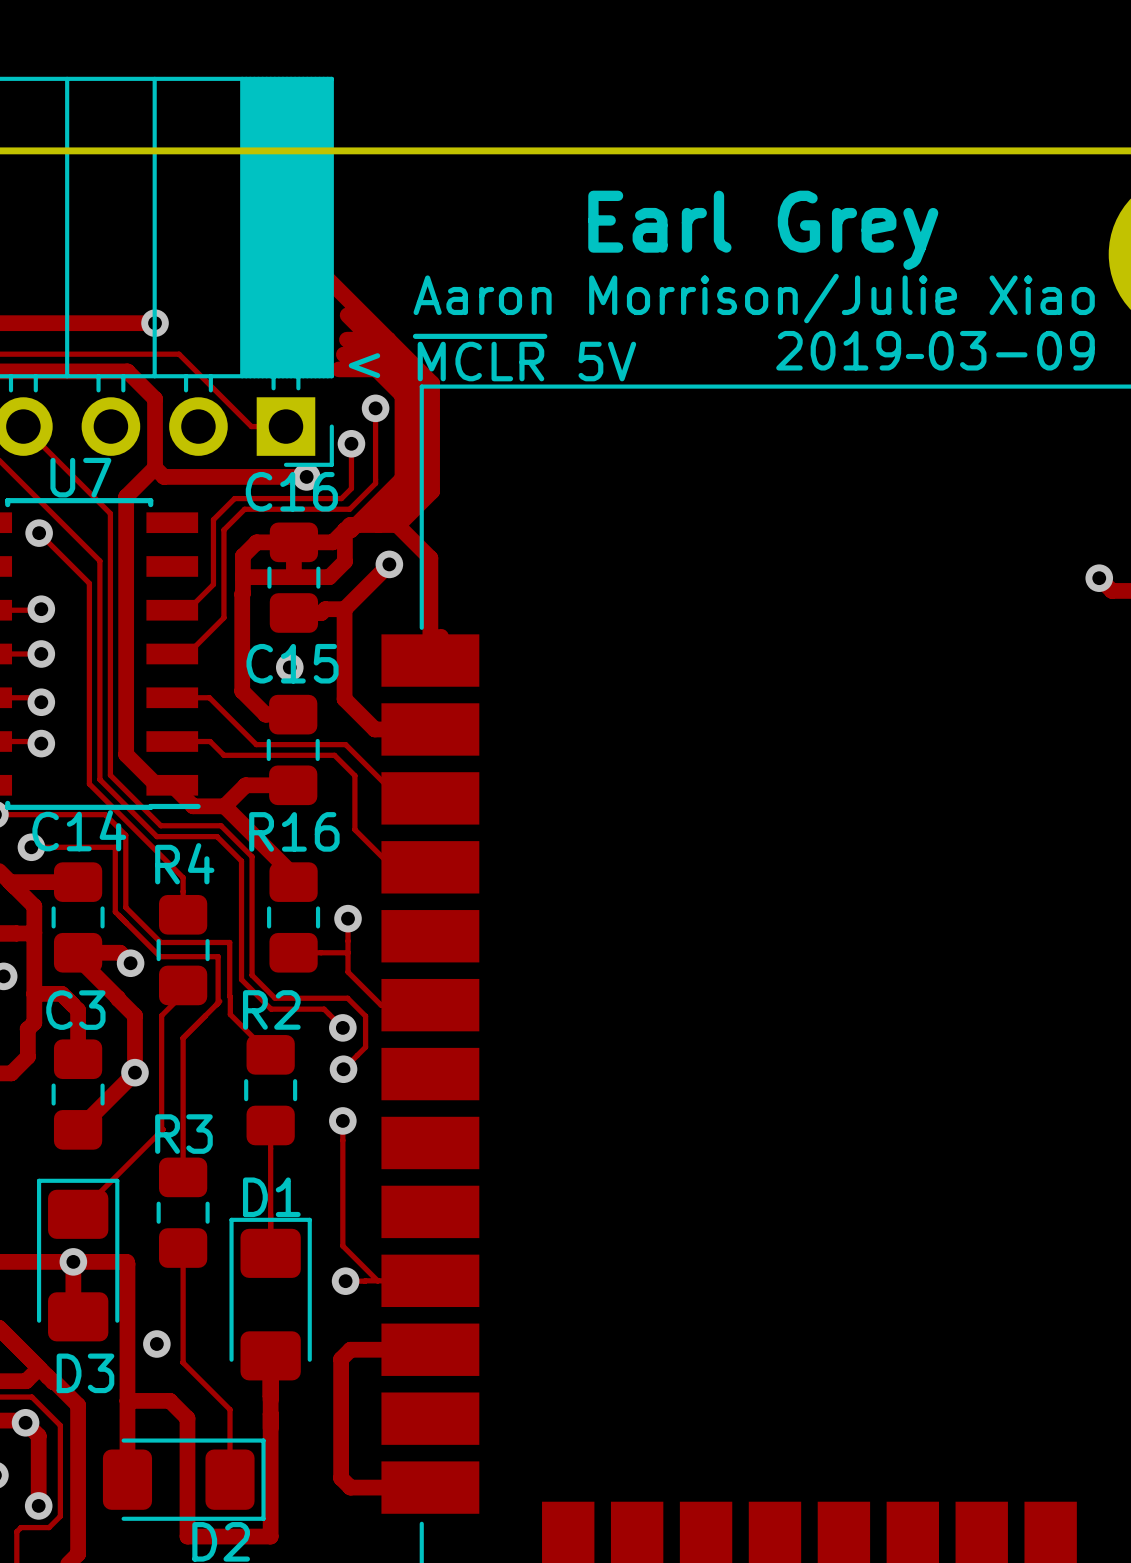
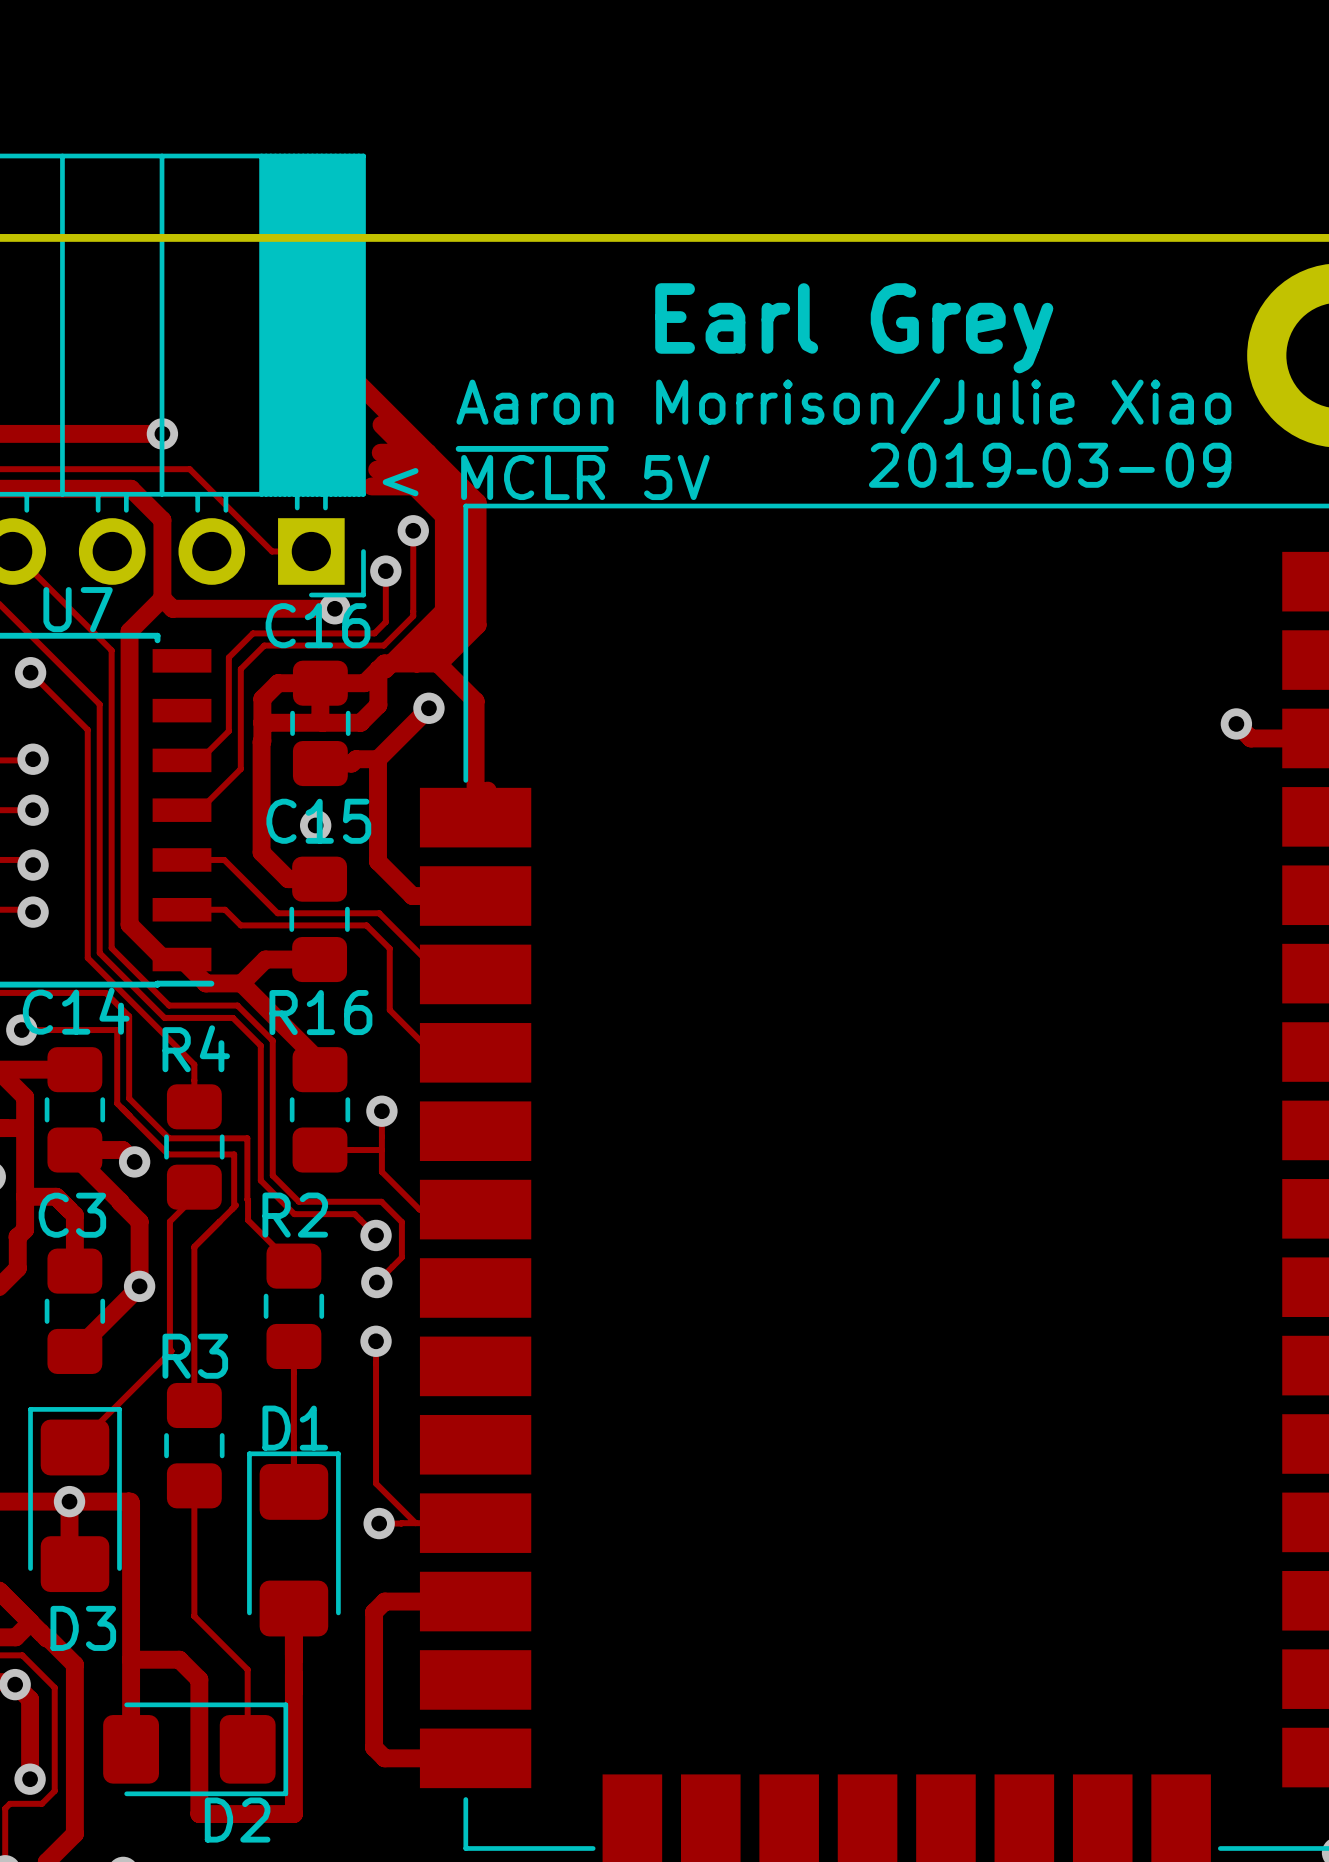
via: (156, 1343) -> none

